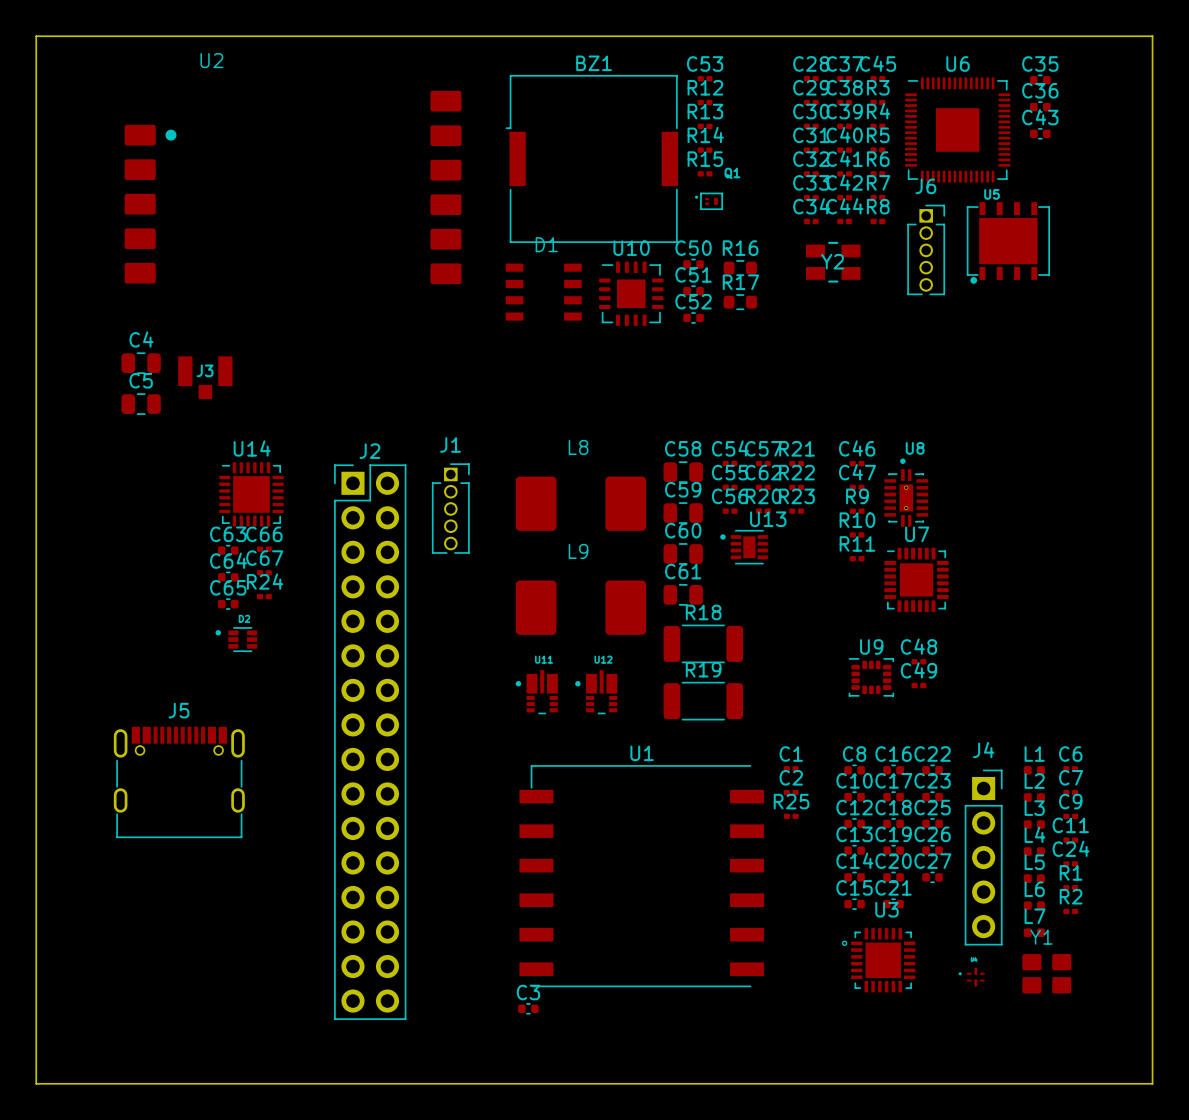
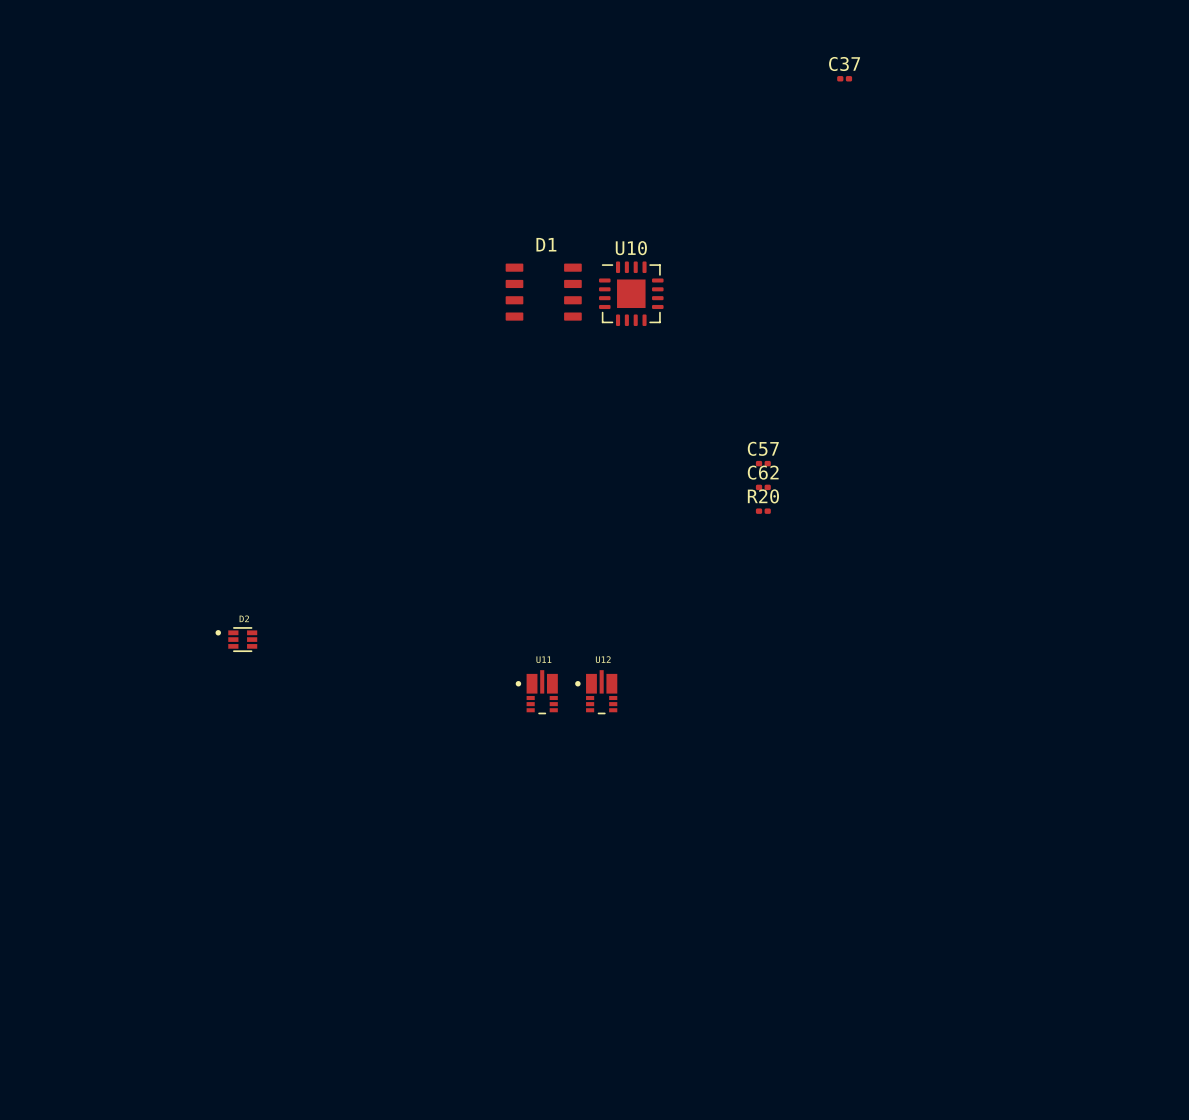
board edge: (36, 36) (1152, 36) (1152, 1083) (36, 1083) (36, 36) -> none
C53: (705, 78) -> none
C28: (811, 78) -> none
C45: (877, 78) -> none
C35: (1040, 80) -> none
R12: (705, 102) -> none
C29: (811, 102) -> none
C38: (844, 102) -> none
R3: (877, 102) -> none
C36: (1040, 107) -> none
R13: (705, 126) -> none
C30: (811, 126) -> none
C39: (844, 126) -> none
R4: (877, 126) -> none
U6: (957, 129) -> none
C43: (1040, 133) -> none
R14: (705, 150) -> none
C31: (811, 150) -> none
C40: (844, 150) -> none
R5: (877, 150) -> none
BZ1: (591, 158) -> none
R15: (705, 173) -> none
C32: (811, 173) -> none
C41: (844, 173) -> none
R6: (877, 173) -> none
U2: (293, 187) -> none
C33: (811, 197) -> none
C42: (844, 197) -> none
R7: (877, 197) -> none
Q1: (709, 201) -> none
C34: (811, 221) -> none
C44: (844, 221) -> none
R8: (877, 221) -> none
U5: (1008, 242) -> none
J6: (926, 249) -> none
Y2: (833, 262) -> none
C50: (693, 264) -> none
R16: (740, 268) -> none
C51: (693, 291) -> none
R17: (740, 302) -> none
C52: (693, 317) -> none
C4: (141, 363) -> none
J3: (205, 377) -> none
C5: (141, 404) -> none
C54: (730, 463) -> none
R21: (796, 463) -> none
C46: (857, 463) -> none
C58: (683, 472) -> none
C55: (730, 487) -> none
R22: (796, 487) -> none
C47: (857, 487) -> none
U8: (906, 492) -> none
U14: (251, 494) -> none
L8: (580, 503) -> none
J1: (450, 508) -> none
C56: (730, 511) -> none
R23: (796, 511) -> none
R9: (857, 511) -> none
C59: (683, 513) -> none
R10: (857, 534) -> none
U13: (744, 547) -> none
C66: (264, 549) -> none
C63: (228, 550) -> none
C60: (683, 553) -> none
R11: (857, 558) -> none
C67: (264, 572) -> none
C64: (228, 577) -> none
U7: (916, 579) -> none
C61: (683, 594) -> none
R24: (264, 596) -> none
C65: (228, 604) -> none
L9: (580, 607) -> none
R18: (703, 643) -> none
C48: (918, 661) -> none
U9: (871, 677) -> none
C49: (918, 685) -> none
R19: (703, 701) -> none
J2: (370, 742) -> none
C1: (791, 768) -> none
C6: (1070, 768) -> none
C8: (854, 770) -> none
C16: (893, 770) -> none
C22: (932, 770) -> none
L1: (1034, 770) -> none
J5: (179, 782) -> none
C2: (791, 792) -> none
C7: (1070, 792) -> none
C10: (854, 797) -> none
C17: (893, 797) -> none
C23: (932, 797) -> none
L2: (1034, 797) -> none
R25: (791, 816) -> none
C9: (1070, 816) -> none
C12: (854, 823) -> none
C18: (893, 823) -> none
C25: (932, 823) -> none
L3: (1034, 824) -> none
C11: (1070, 840) -> none
C13: (854, 850) -> none
C19: (893, 850) -> none
C26: (932, 850) -> none
L4: (1034, 851) -> none
J4: (983, 857) -> none
C24: (1070, 863) -> none
U1: (641, 876) -> none
C14: (854, 877) -> none
C20: (893, 877) -> none
C27: (932, 877) -> none
L5: (1034, 878) -> none
R1: (1070, 887) -> none
C15: (854, 904) -> none
C21: (893, 904) -> none
L6: (1034, 905) -> none
R2: (1070, 911) -> none
L7: (1034, 932) -> none
U3: (878, 960) -> none
Y1: (1046, 973) -> none
part: (971, 977) -> none
C3: (528, 1008) -> none

